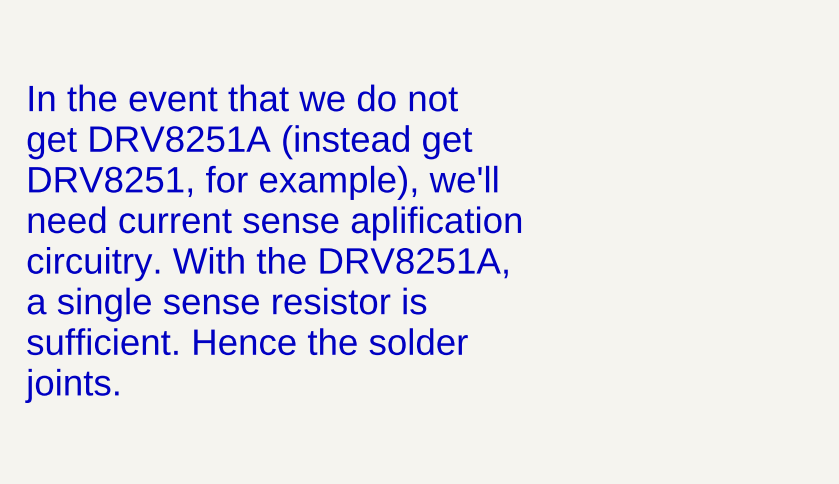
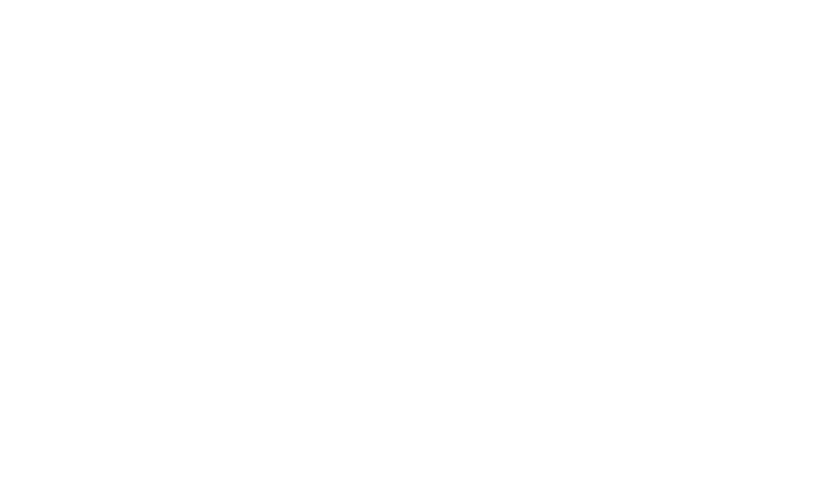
text: In the event that we do not (243, 98) -> none
text: get DRV8251A (instead get (249, 142) -> none
text: DRV8251, for example), we'll (263, 182) -> none
text: need current sense aplification (274, 223) -> none
text: circuitry. With the DRV8251A, (267, 264) -> none
text: a single sense resistor is (226, 304) -> none
text: sufficient. Hence the solder (247, 341) -> none
text: joints. (71, 385) -> none

